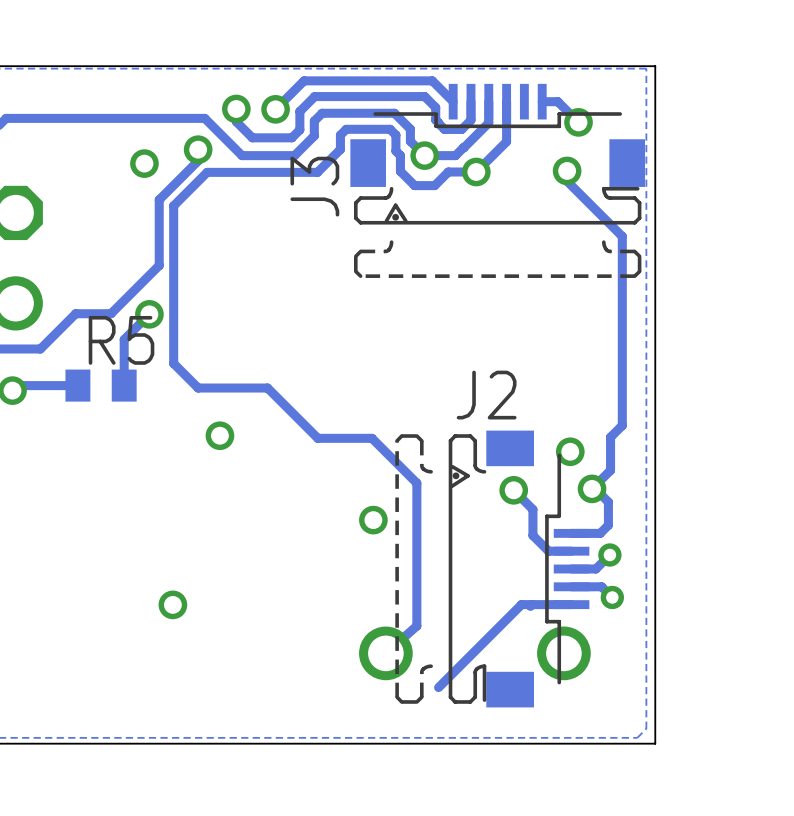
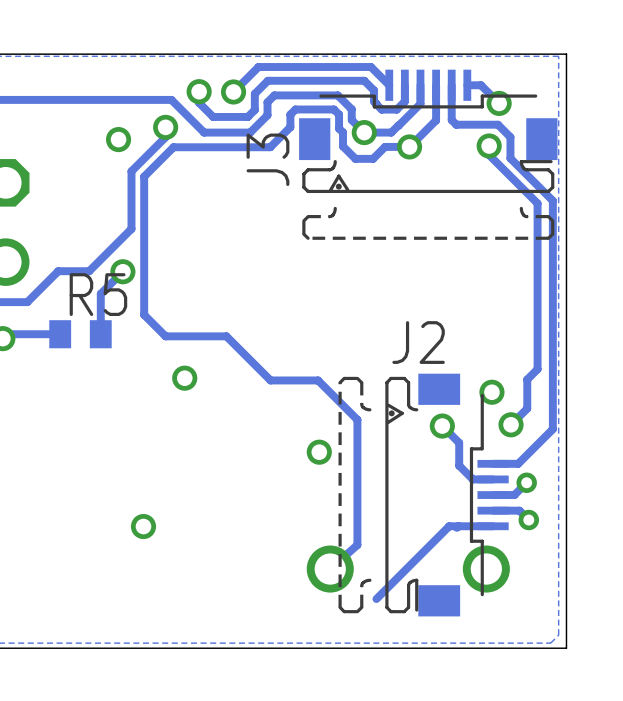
track: (592, 488) (595, 488) (608, 502) (608, 525) -> (451, 85) (451, 120) (456, 124) (497, 124) (510, 137) (510, 158) (552, 200) (552, 429) (525, 456)

